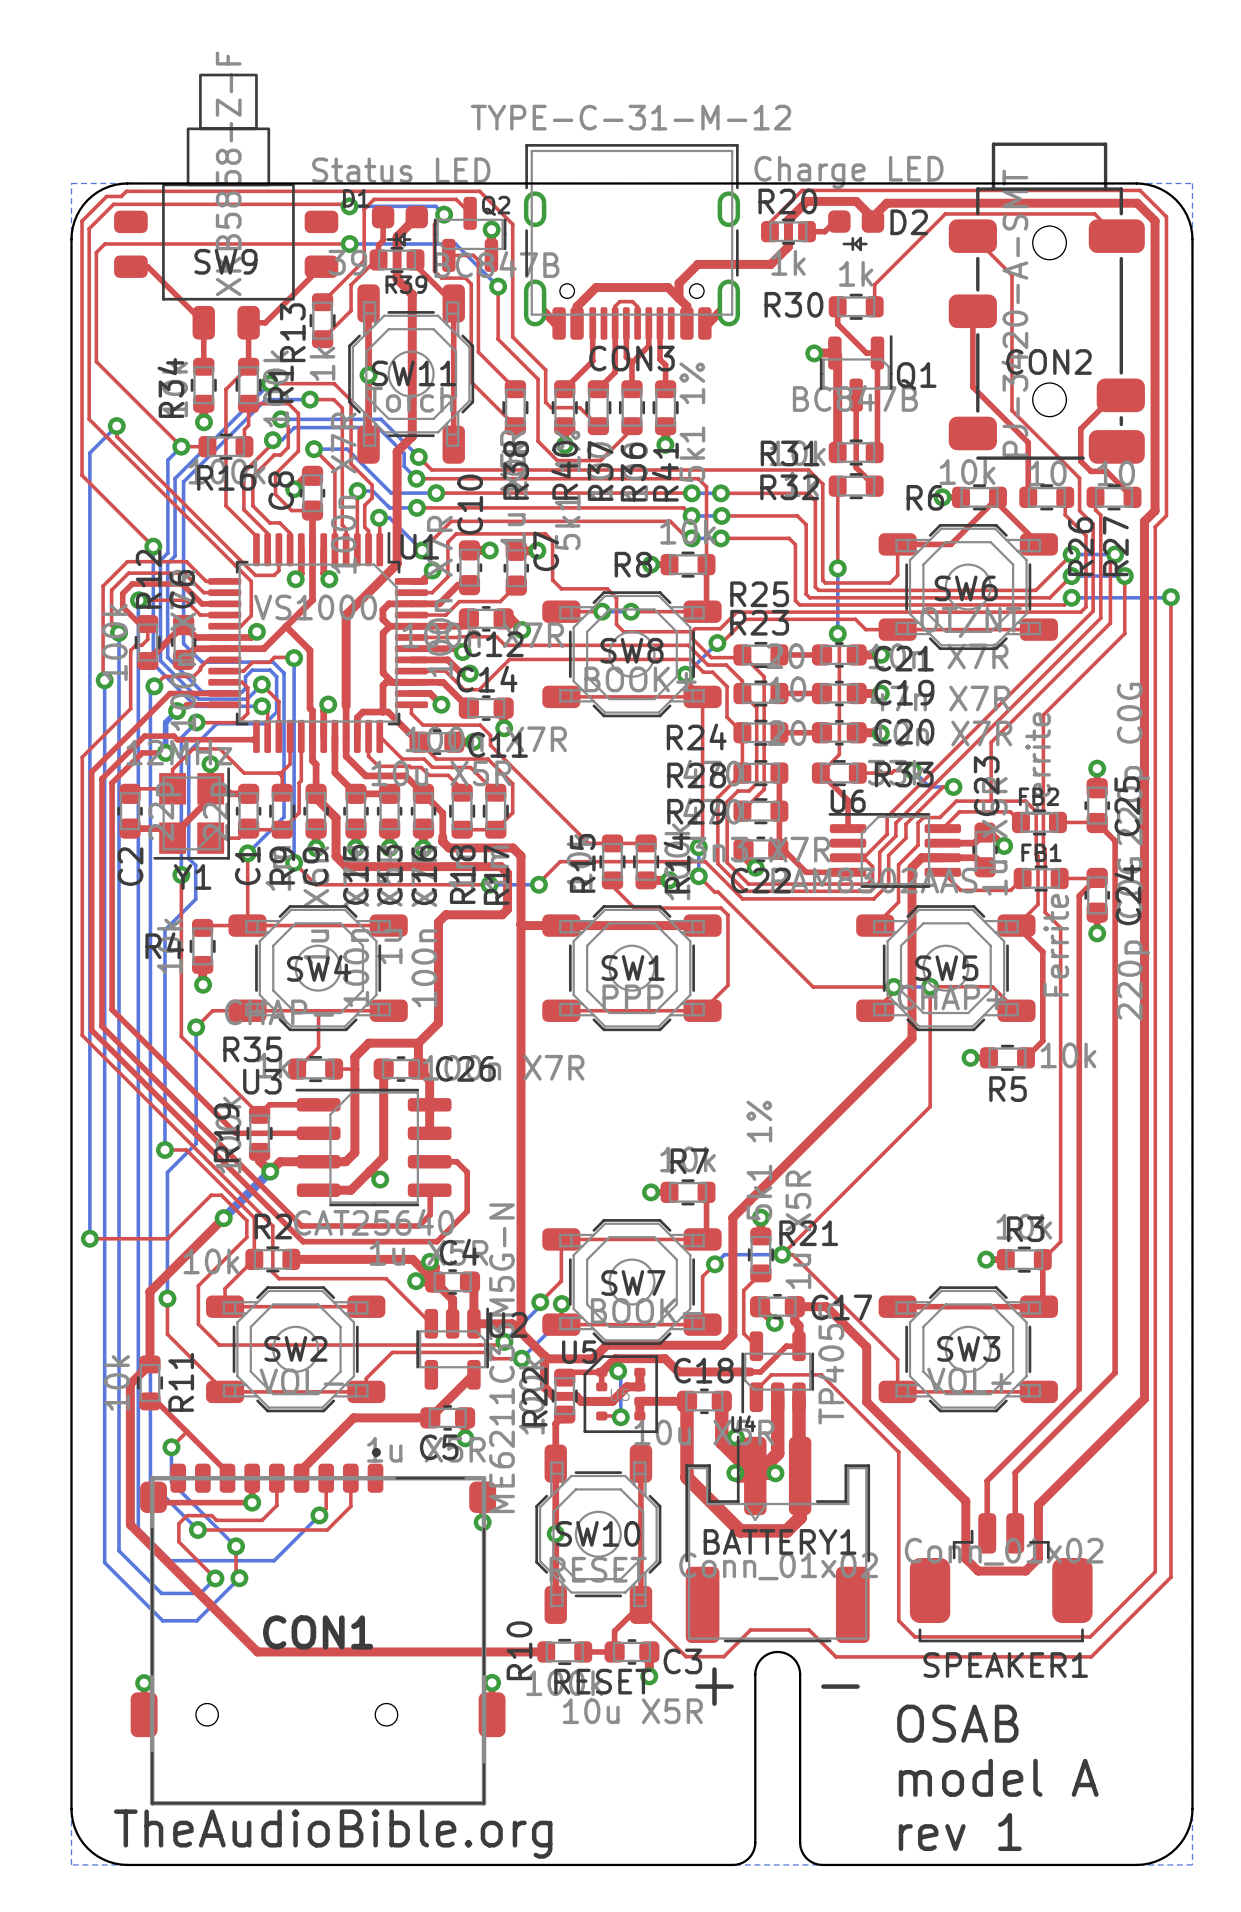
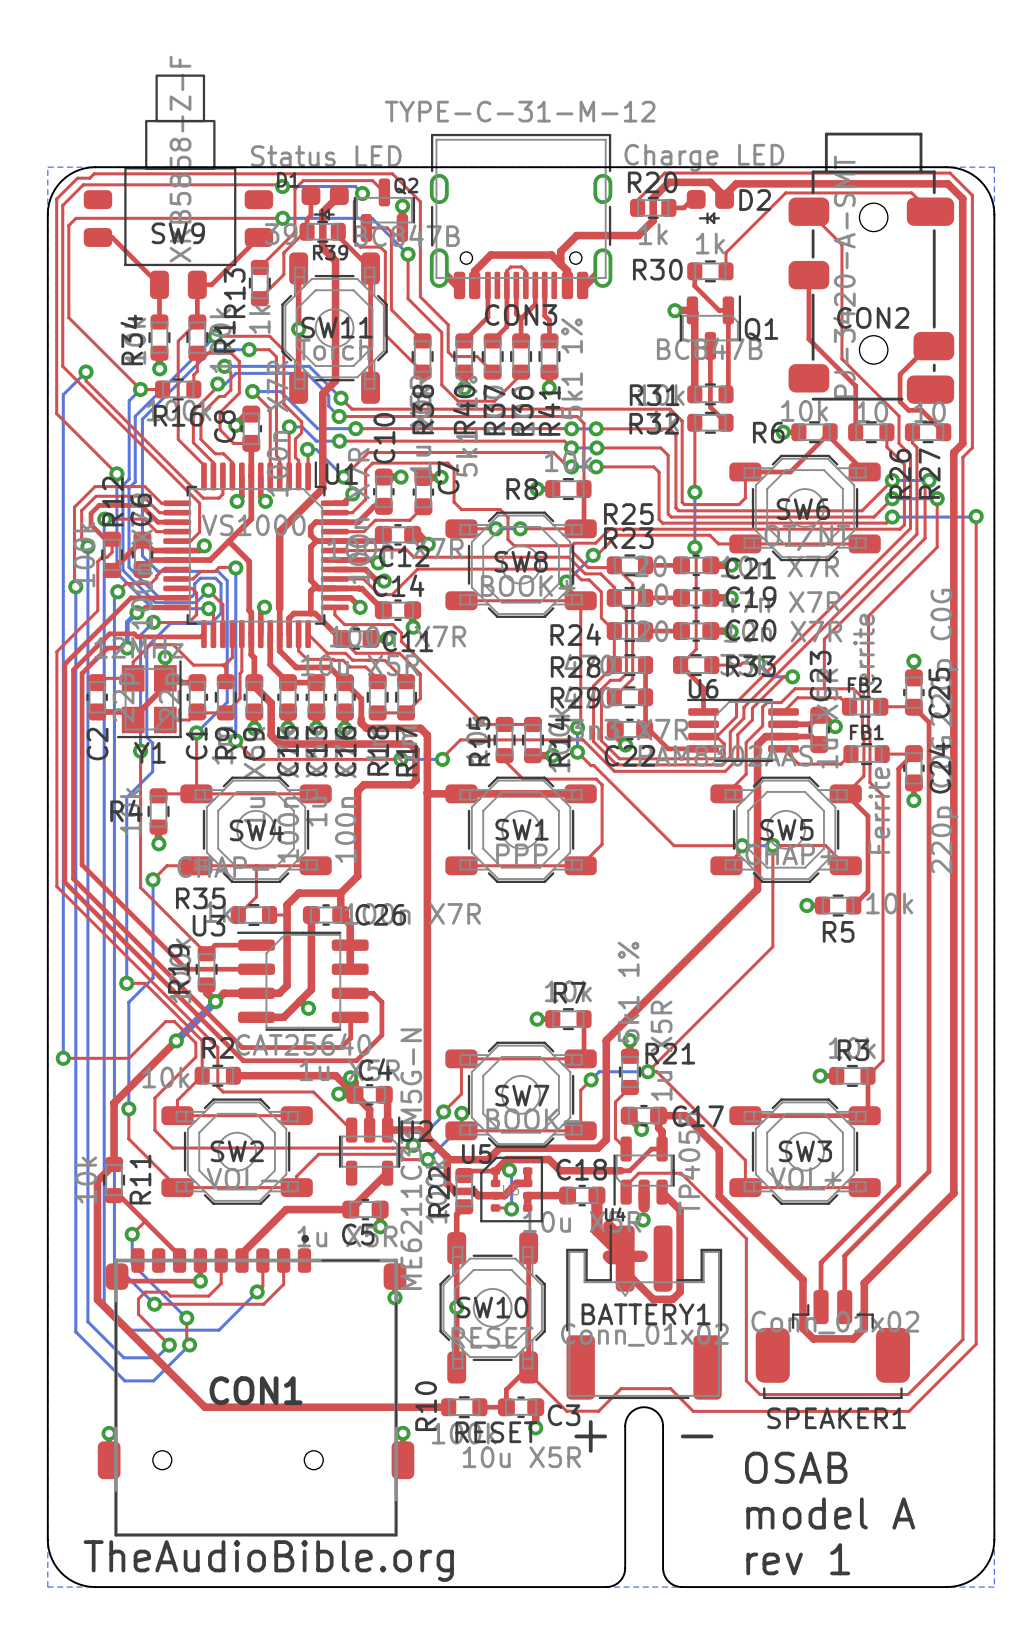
top track: (799, 1397) (800, 1517) (786, 1530) (740, 1530) (687, 1477) (687, 1401) -> none
top track: (777, 1414) (777, 1453) (755, 1475) -> (662, 1192) (680, 1210) (680, 1292) (672, 1299) (653, 1299) (625, 1271) (625, 1258)
via: none -> (643, 1219)
via: (735, 1437) -> none
via: (735, 1473) -> none
via: (775, 1473) -> none

